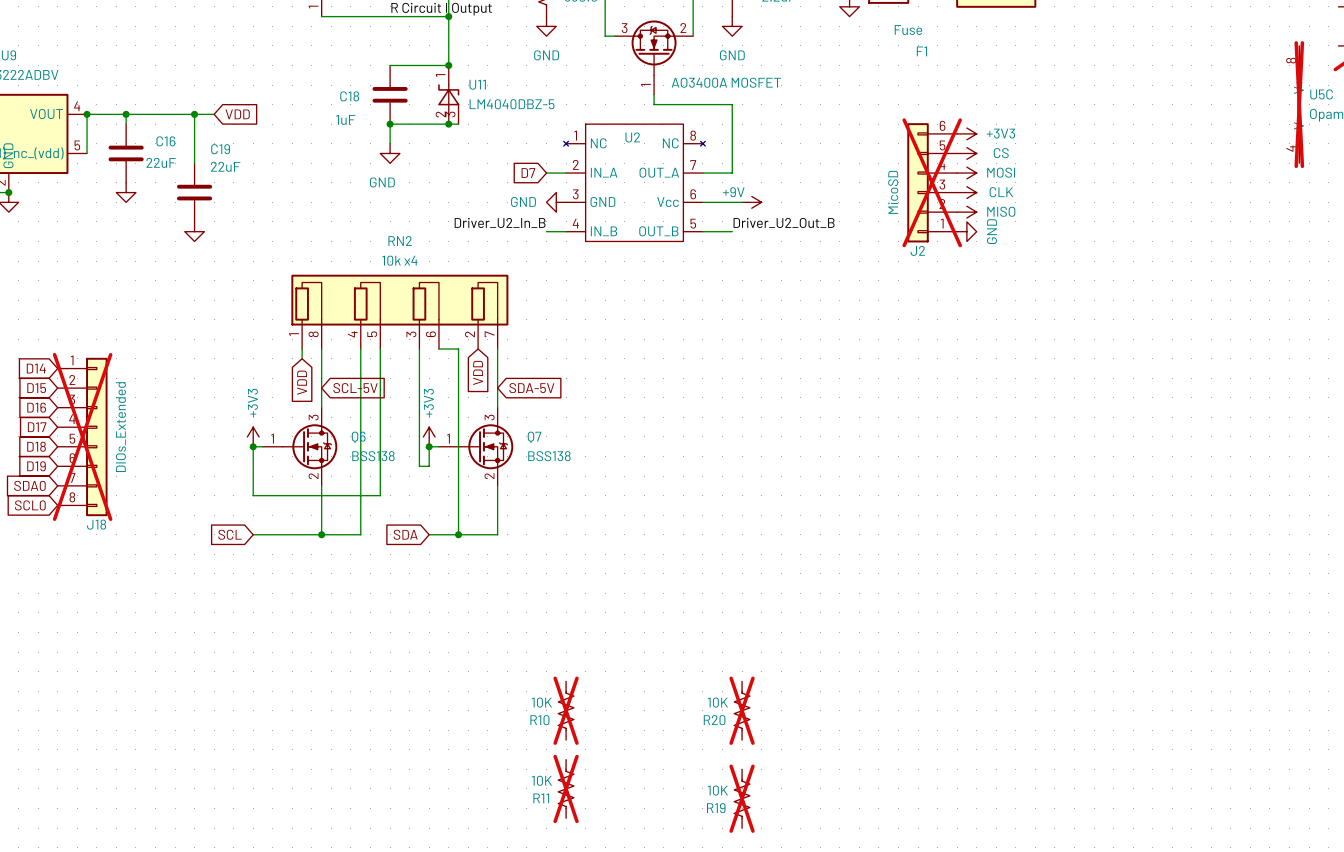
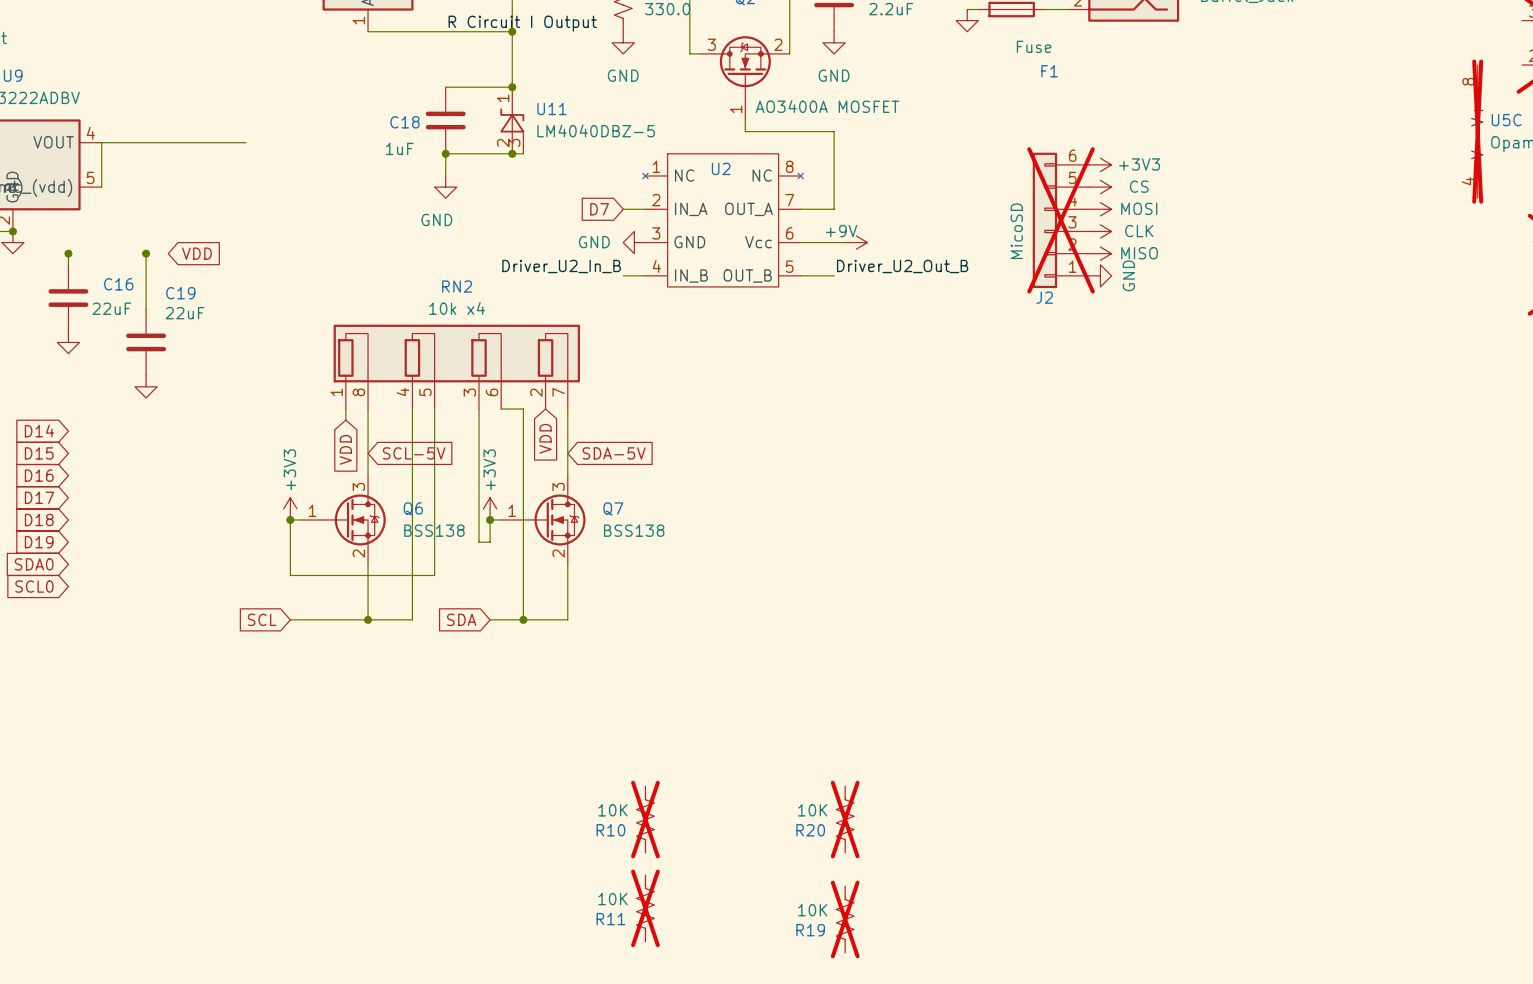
junction: (87, 114) -> none
wire: (126, 114) (126, 124) -> (68, 253) (68, 264)
junction: (126, 114) -> none
wire: (194, 114) (194, 163) -> (146, 253) (146, 309)
junction: (194, 114) -> none
global label position: VDD (237, 114) -> VDD (196, 253)
C16 position: (126, 153) -> (68, 298)
power symbol: (126, 192) -> none
C19 position: (194, 192) -> (146, 342)
junction: none -> (68, 253)
junction: none -> (146, 253)
power symbol: (194, 231) -> none
power symbol: none -> (68, 342)
power symbol: none -> (146, 386)
J18: DIOs_Extended (82, 436) -> none

